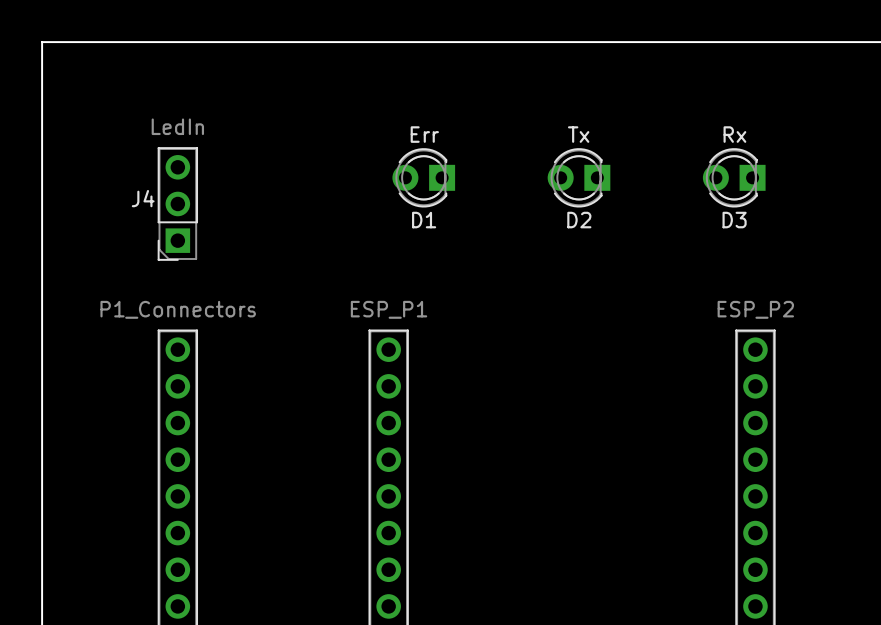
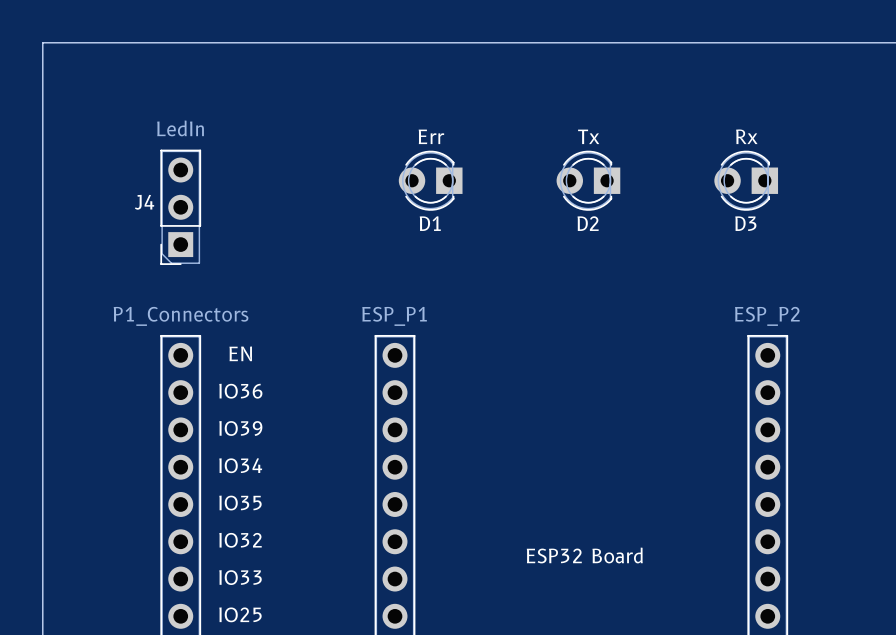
text: none -> EN (240, 353)
text: none -> IO36 (240, 391)
text: none -> IO39 (240, 428)
text: none -> IO34 (240, 465)
text: none -> IO35 (240, 503)
text: none -> IO32 (240, 540)
text: none -> ESP32 Board (584, 555)
text: none -> IO33 (240, 577)
text: none -> IO25 (240, 614)

